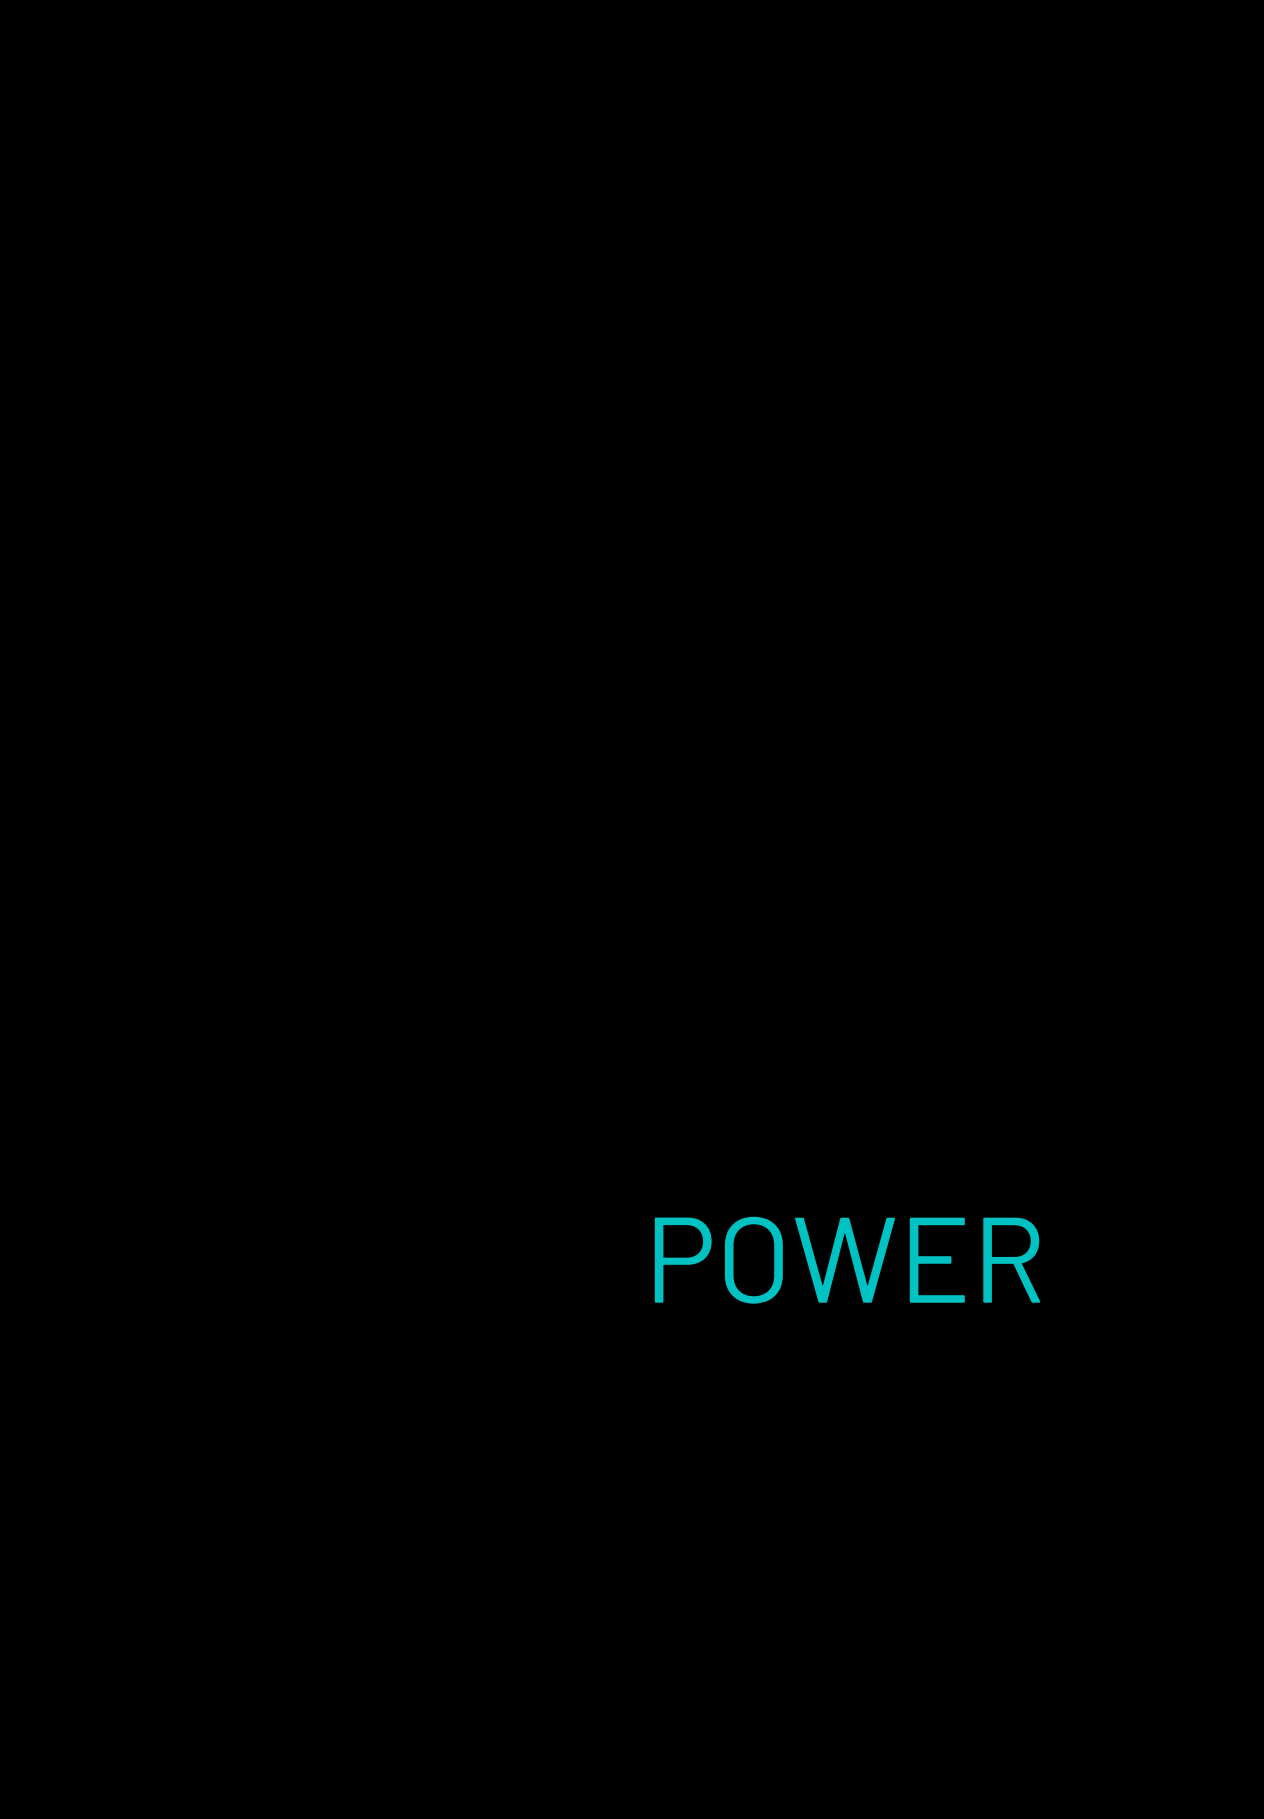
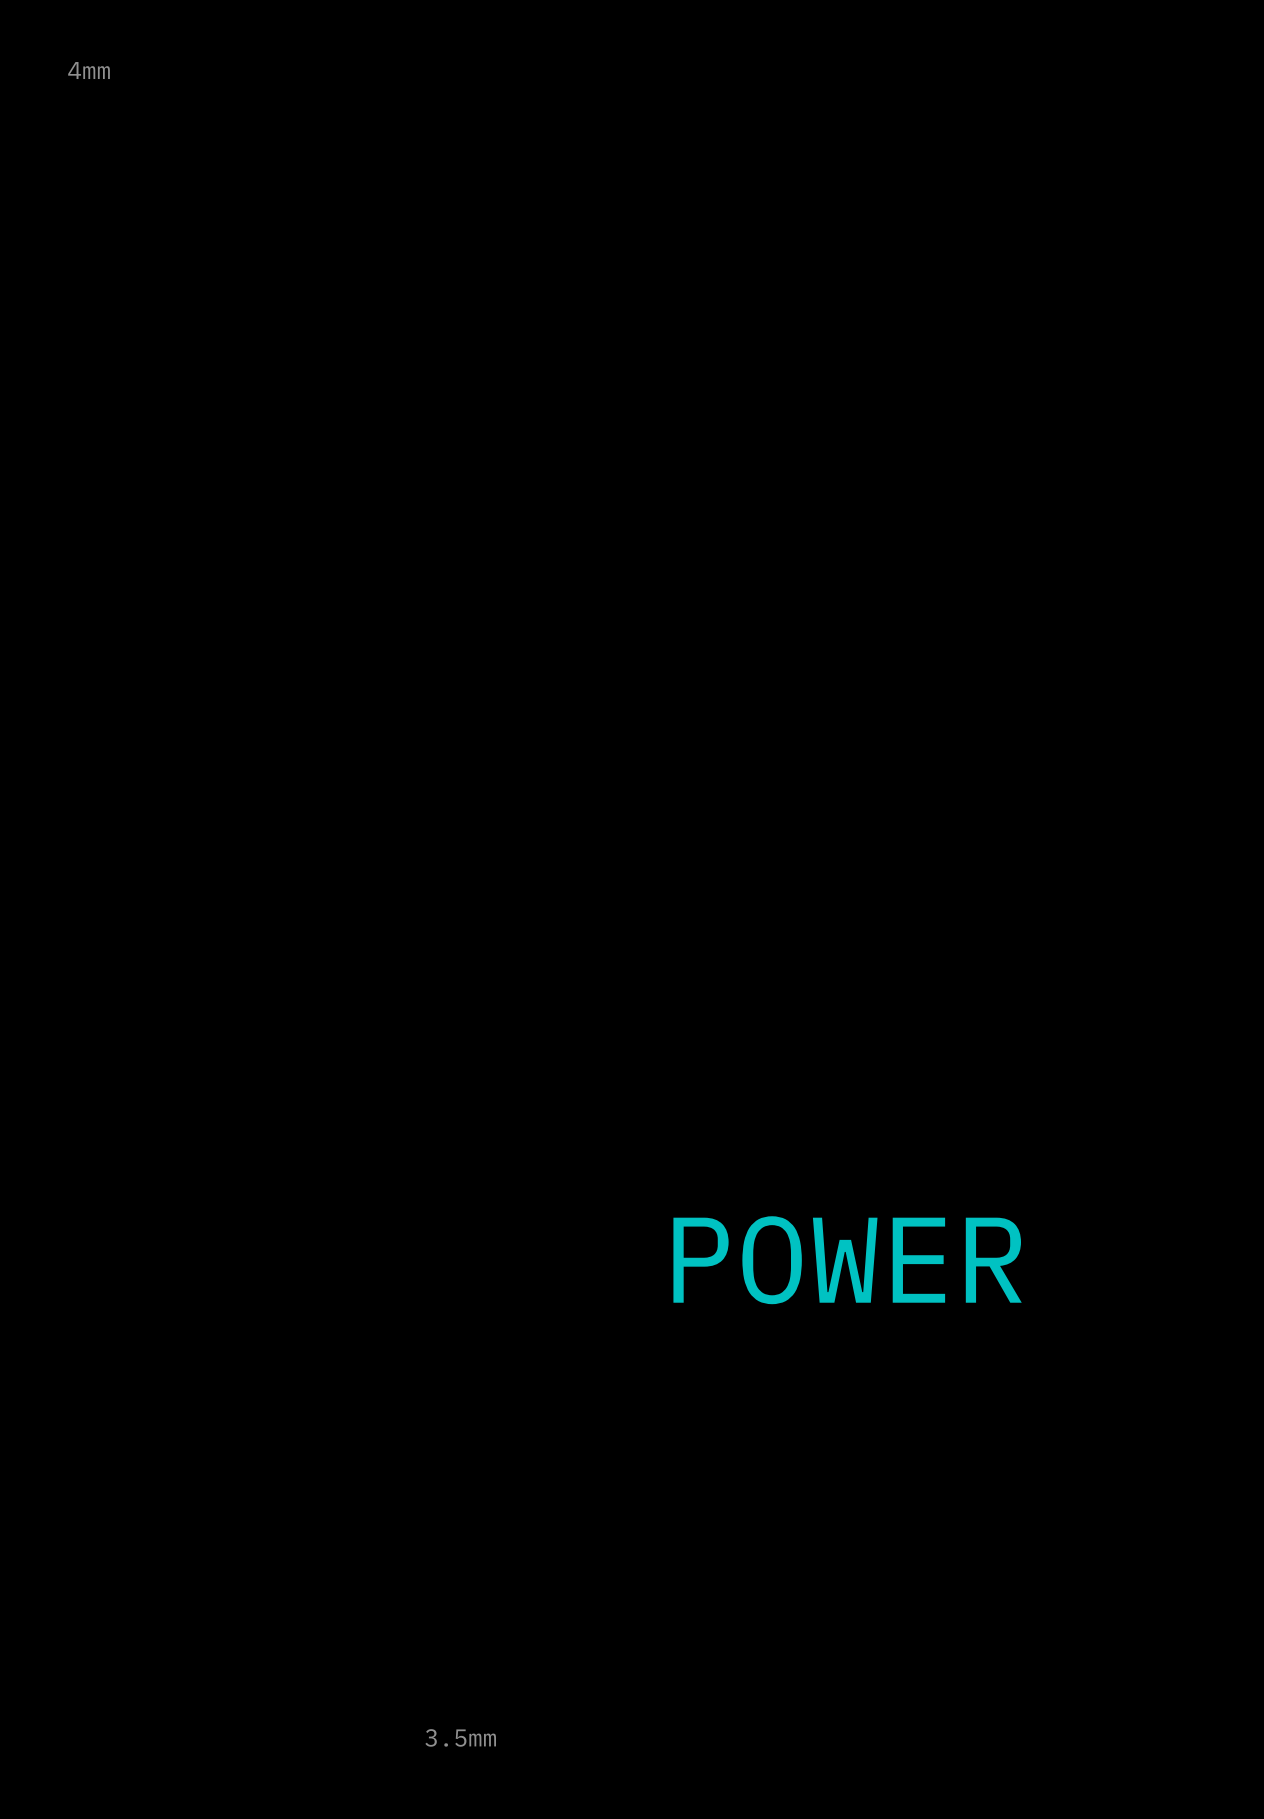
text: none -> 4mm (89, 70)
text: none -> 3.5mm (460, 1737)

